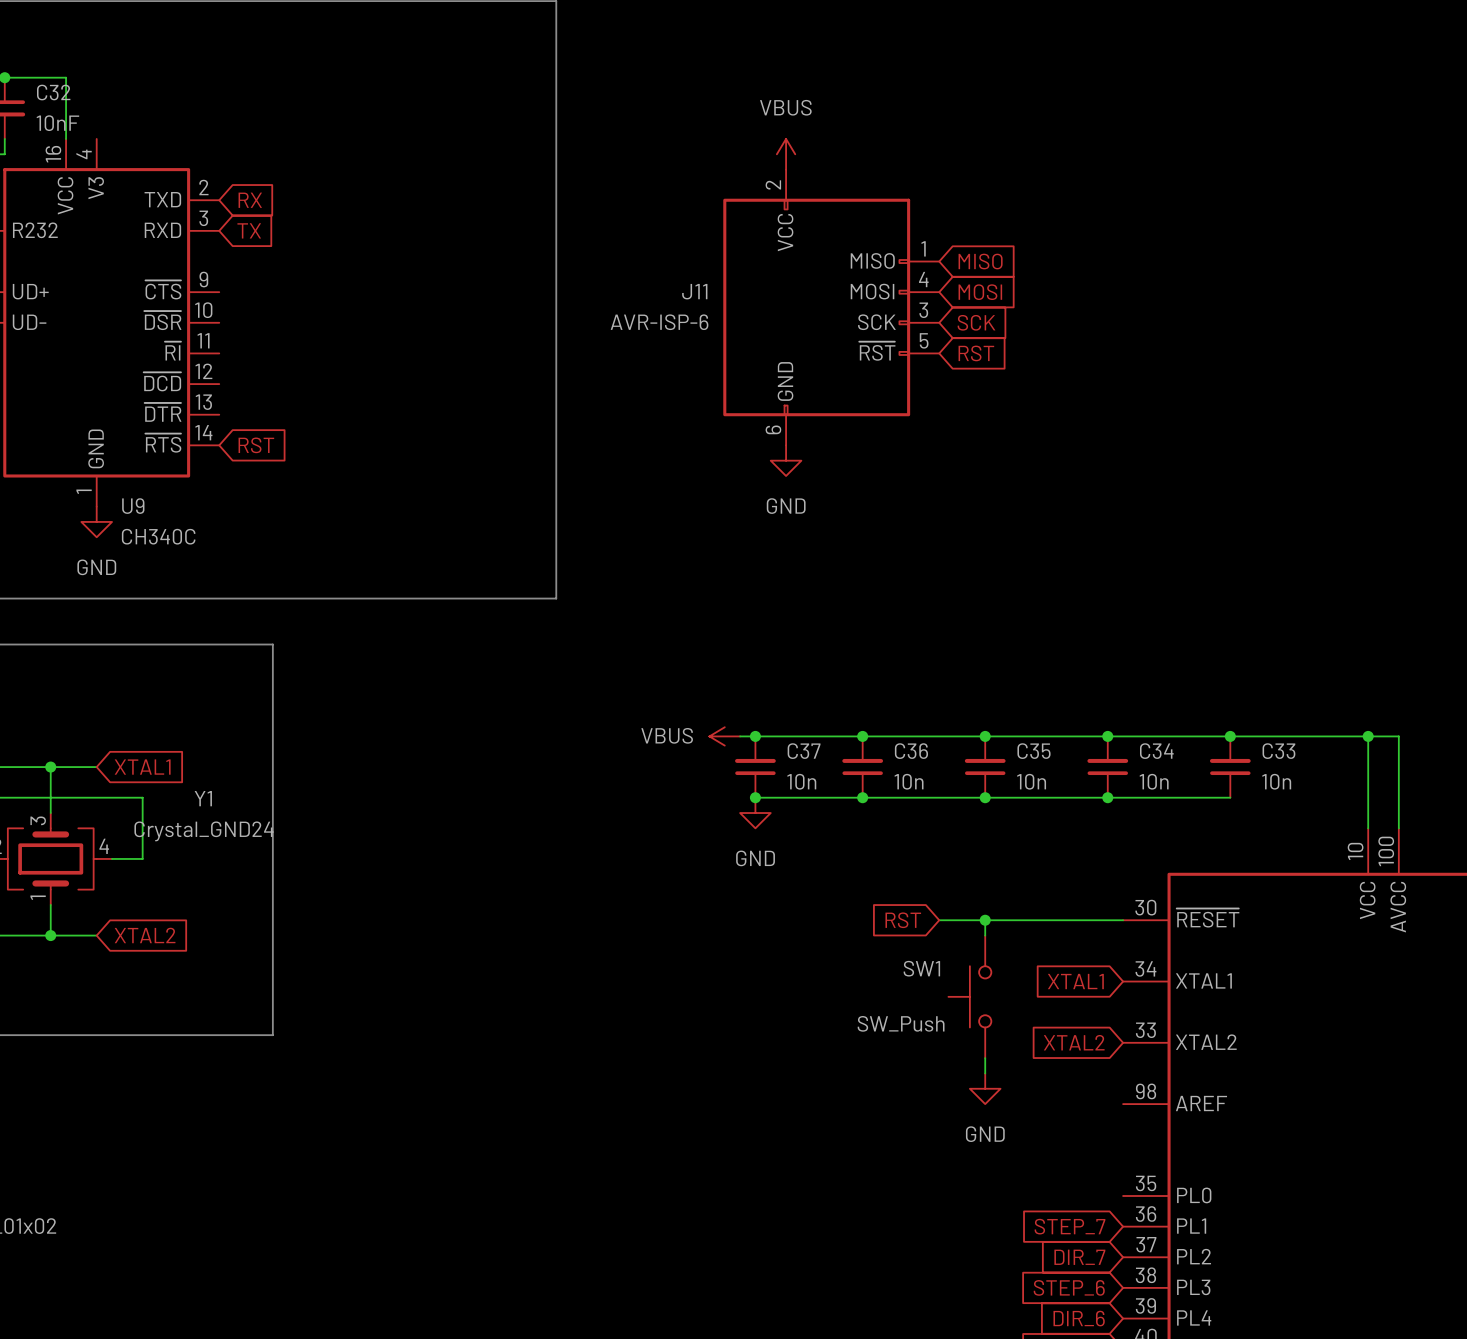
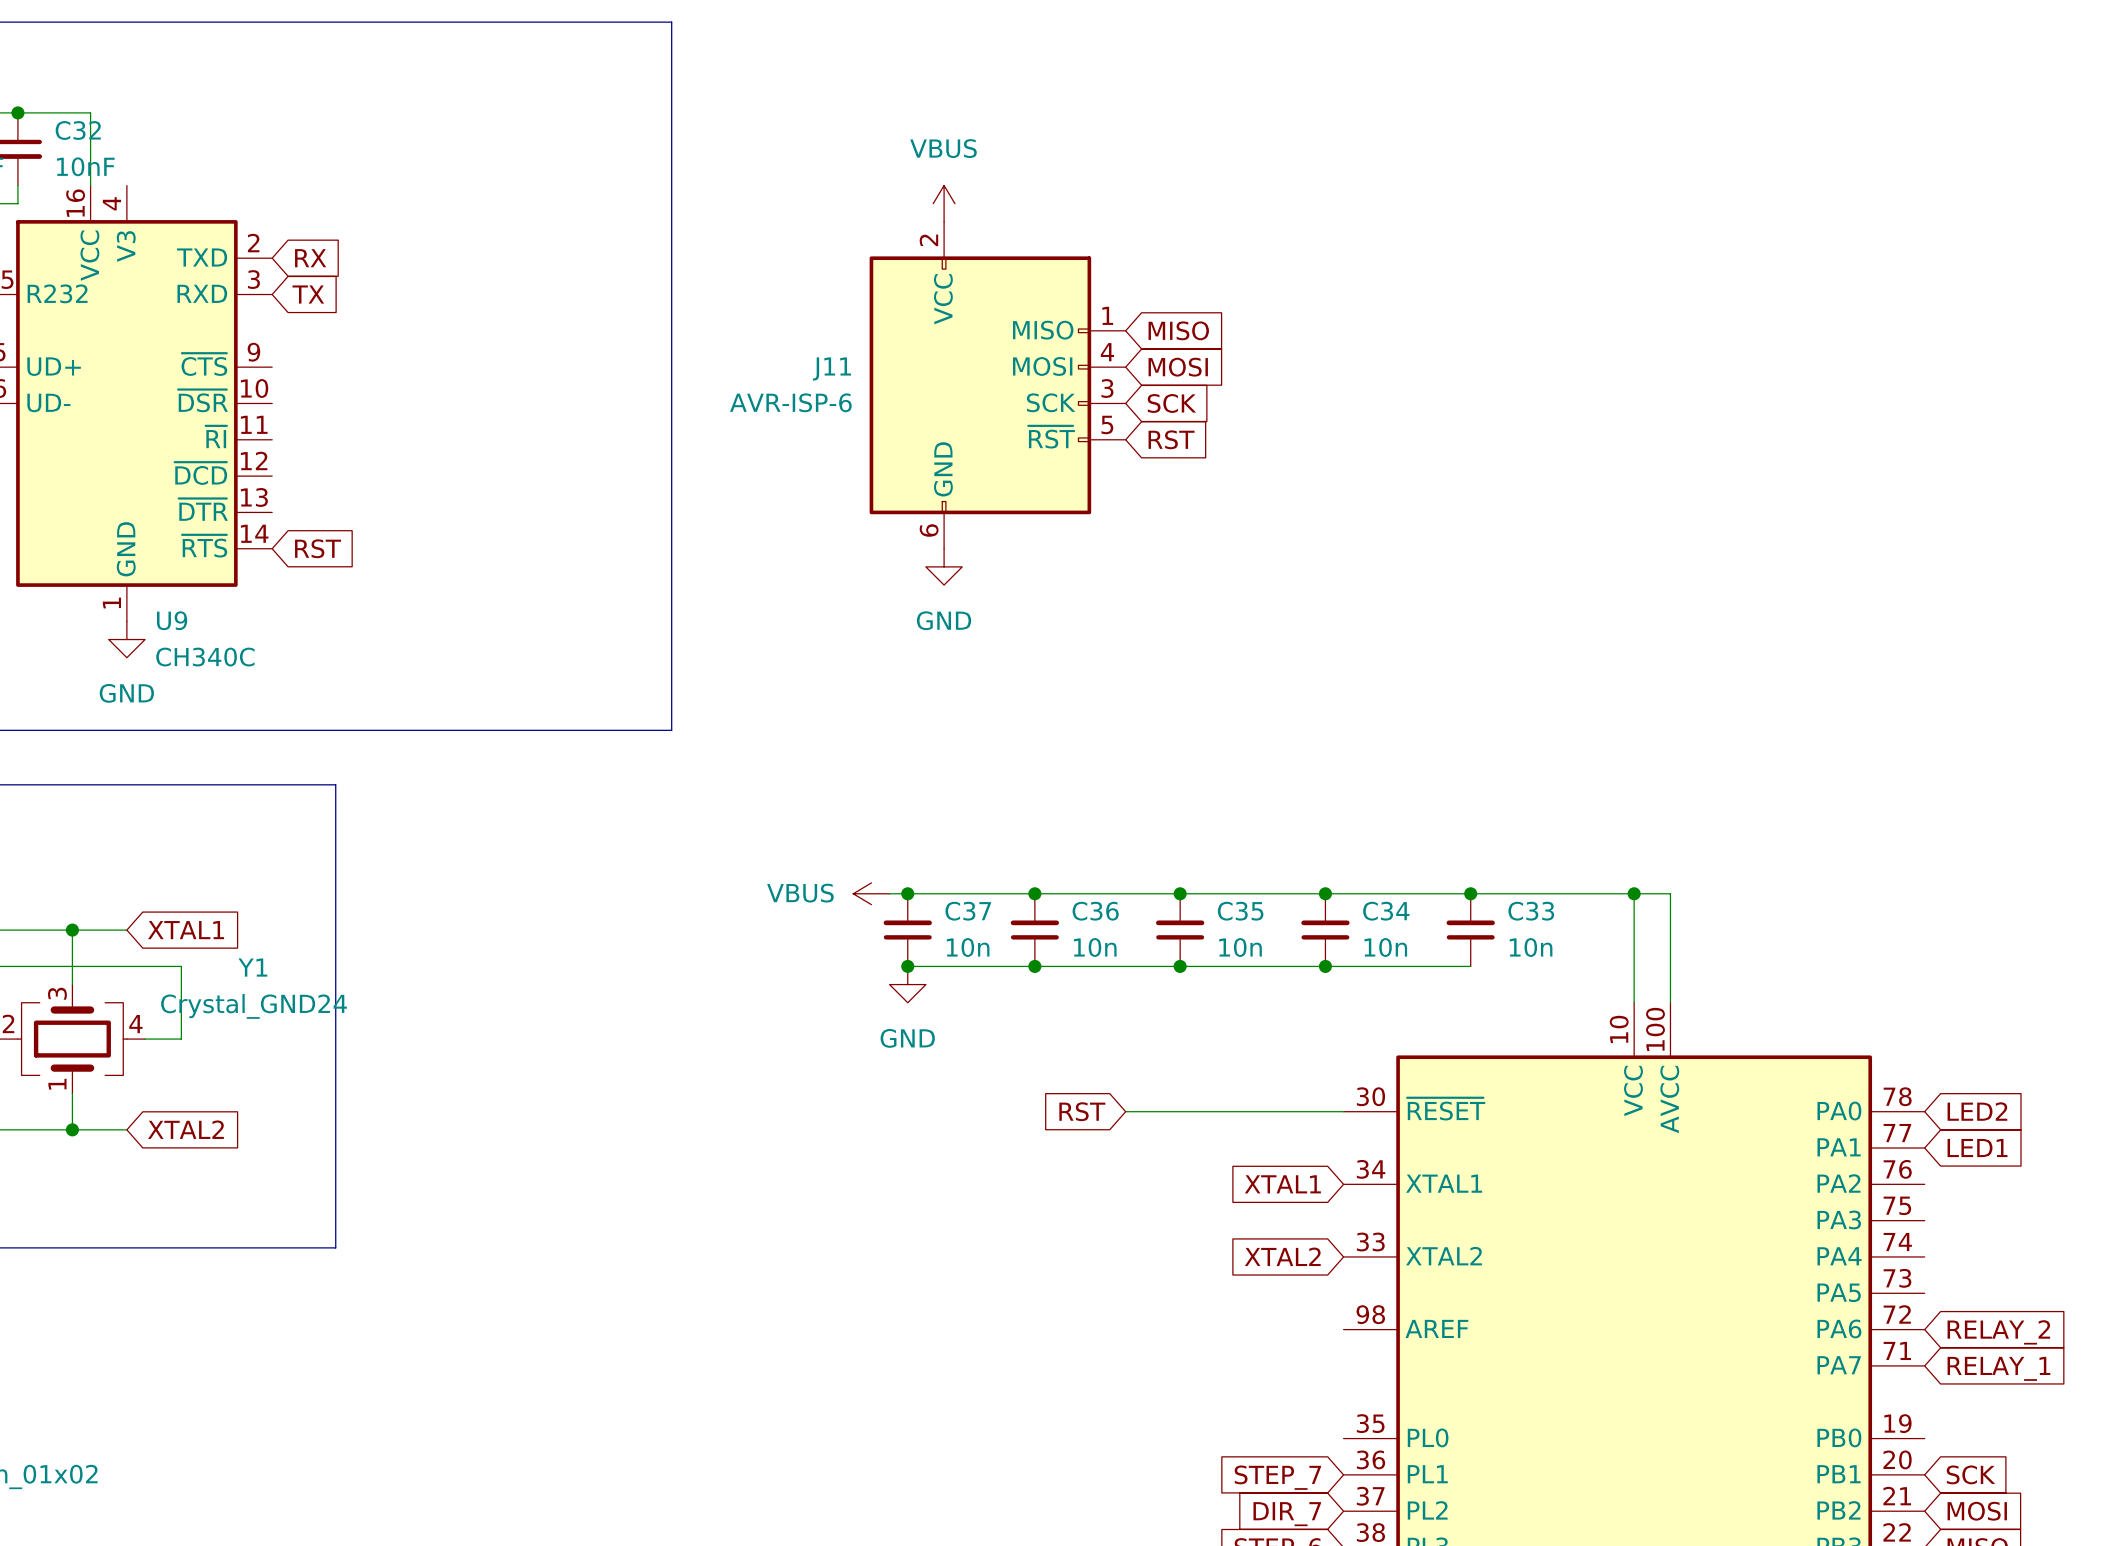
wire: (985, 920) (985, 935) -> none
junction: (985, 920) -> none
SW1: SW_Push (969, 996) -> none
wire: (985, 1058) (985, 1073) -> none
power symbol: GND (985, 1088) -> none

